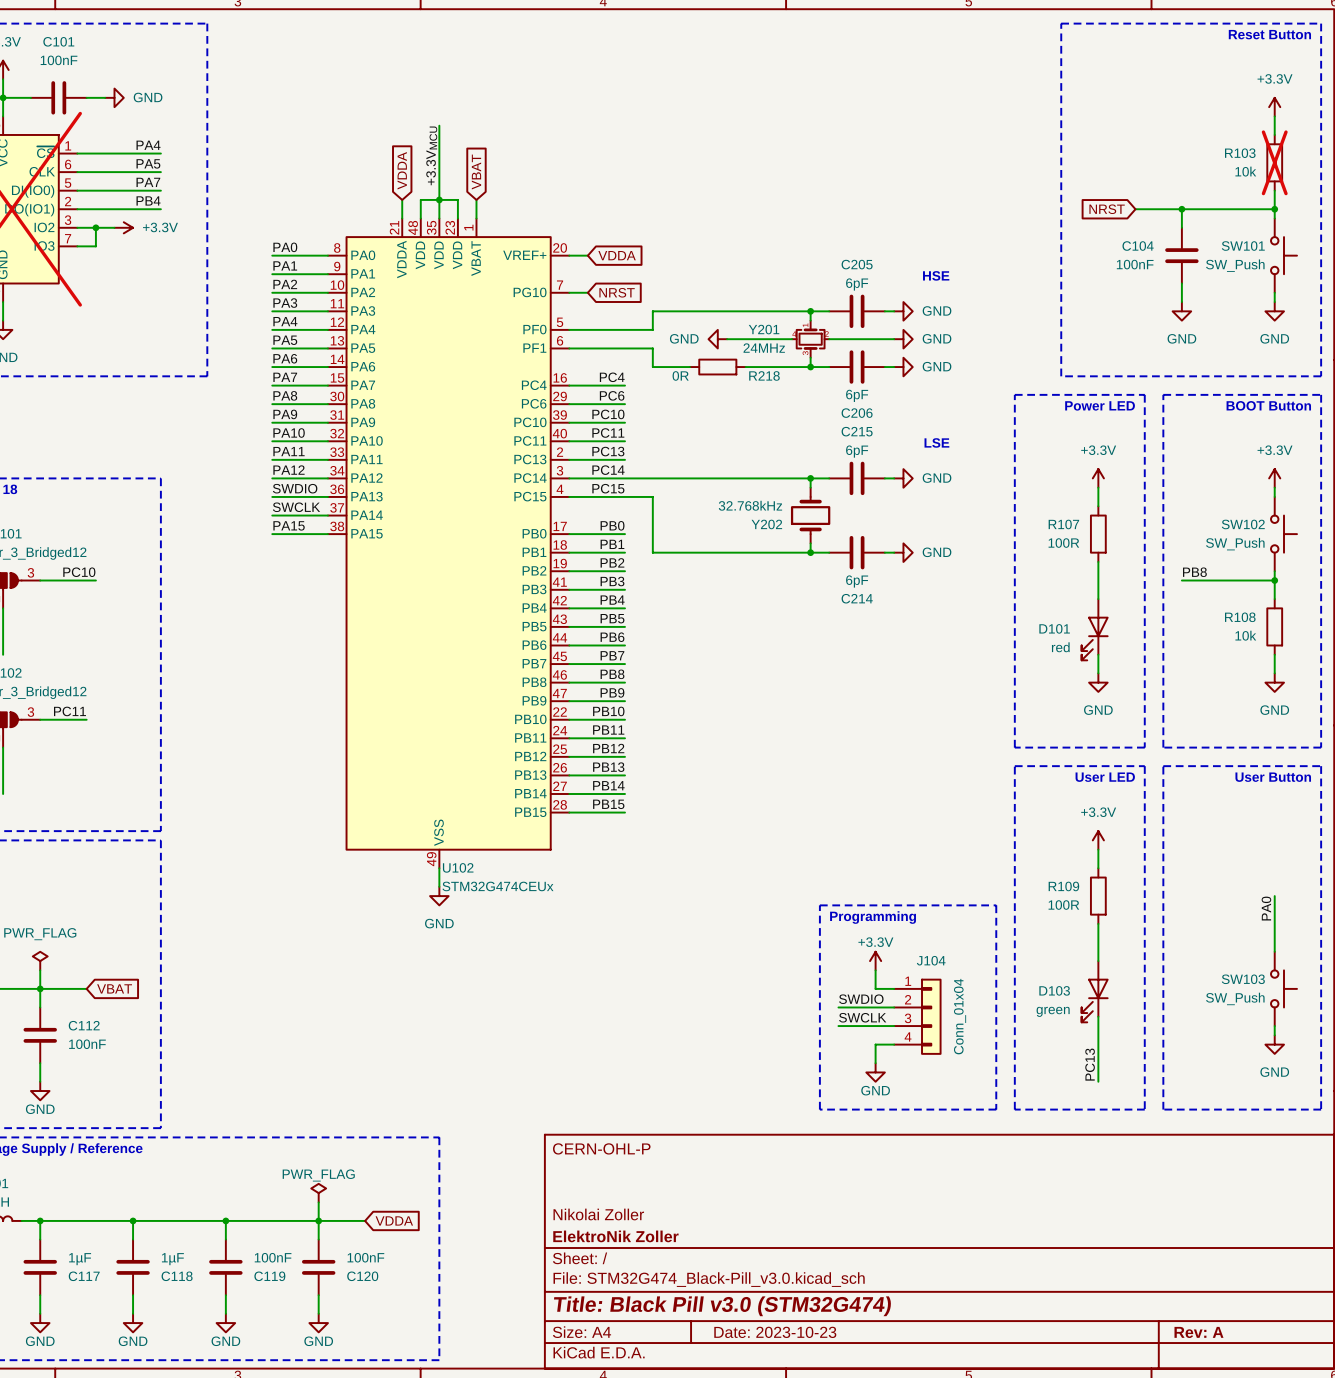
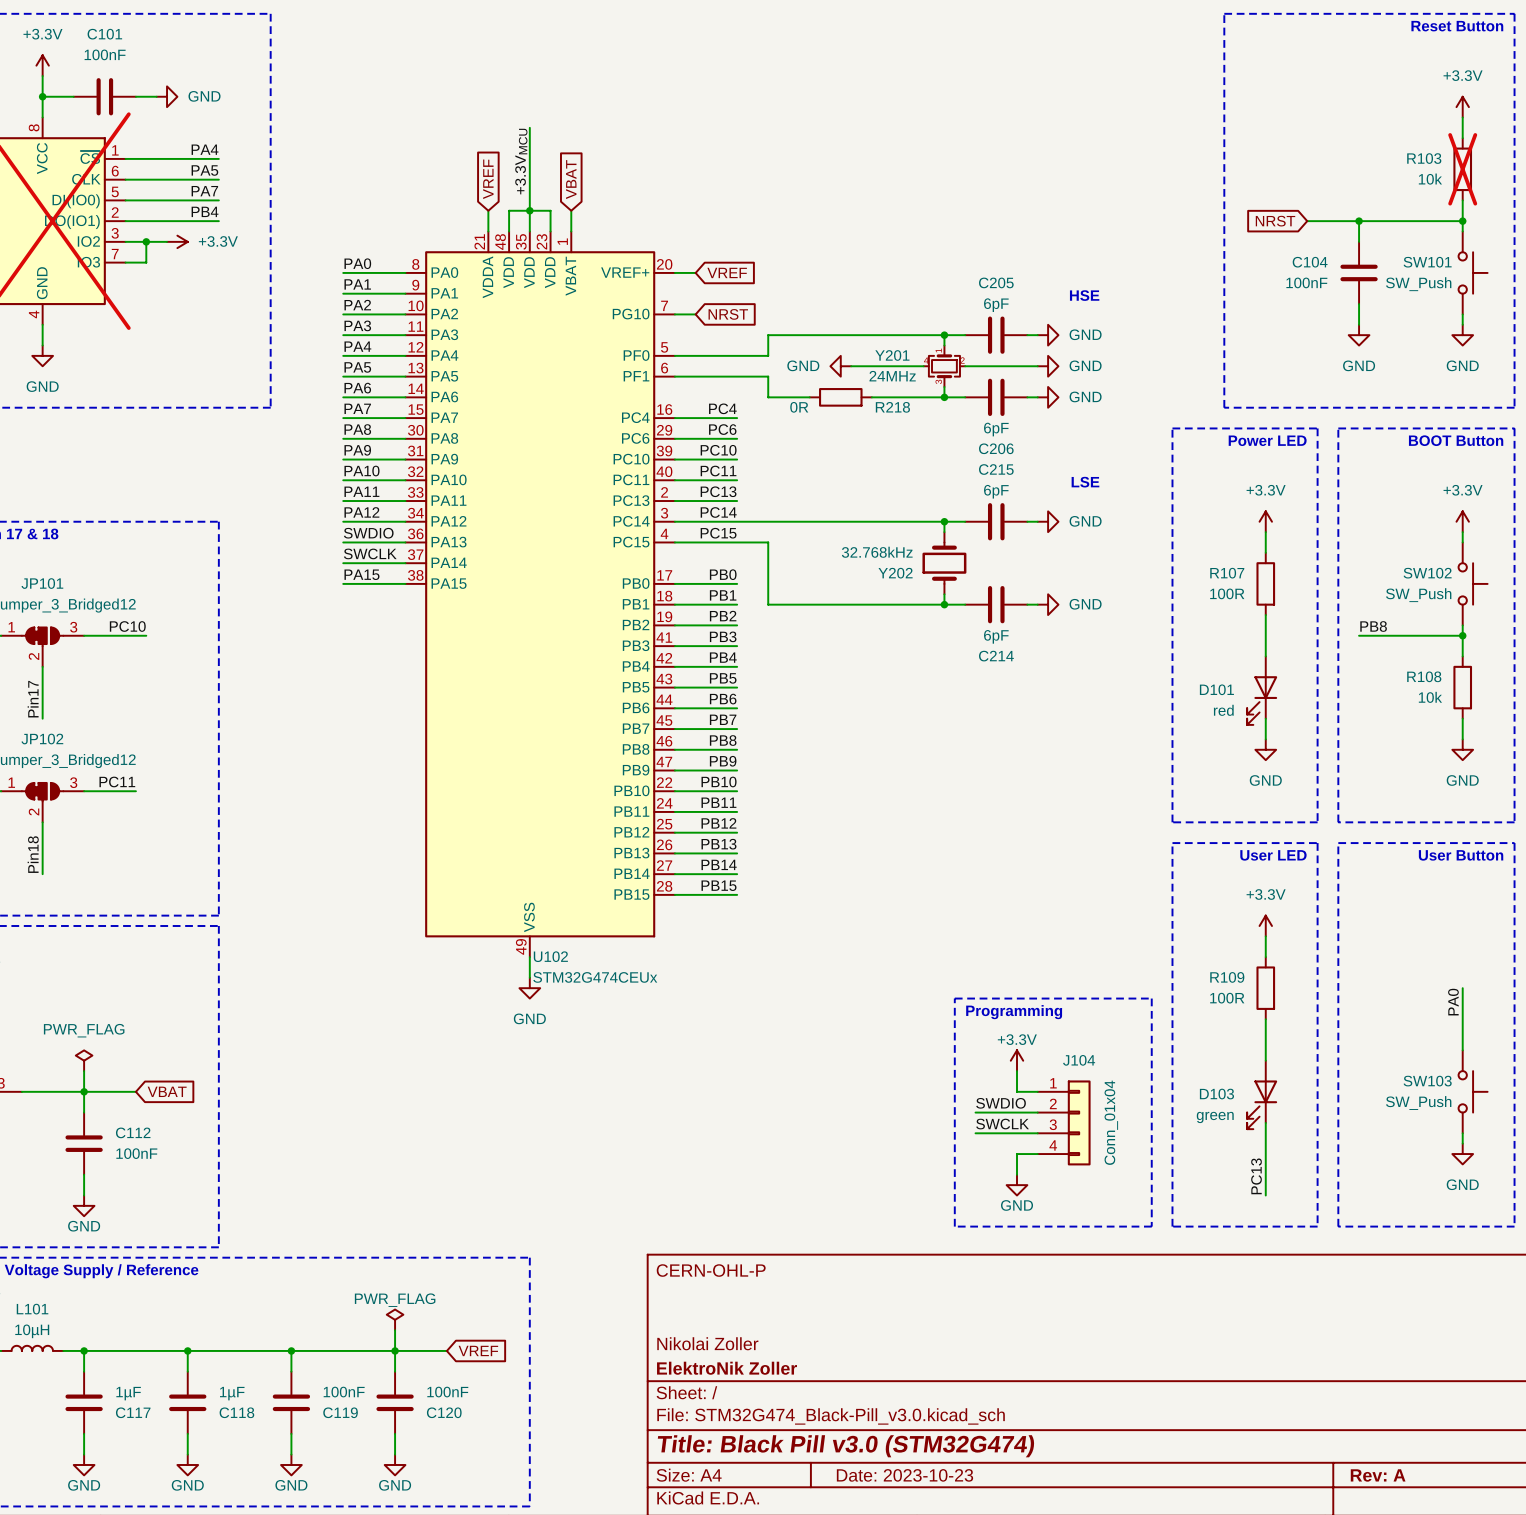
global label: VDDA (402, 170) -> VREF (488, 179)
global label: VDDA (617, 255) -> VREF (727, 272)
global label: VDDA (394, 1220) -> VREF (478, 1350)

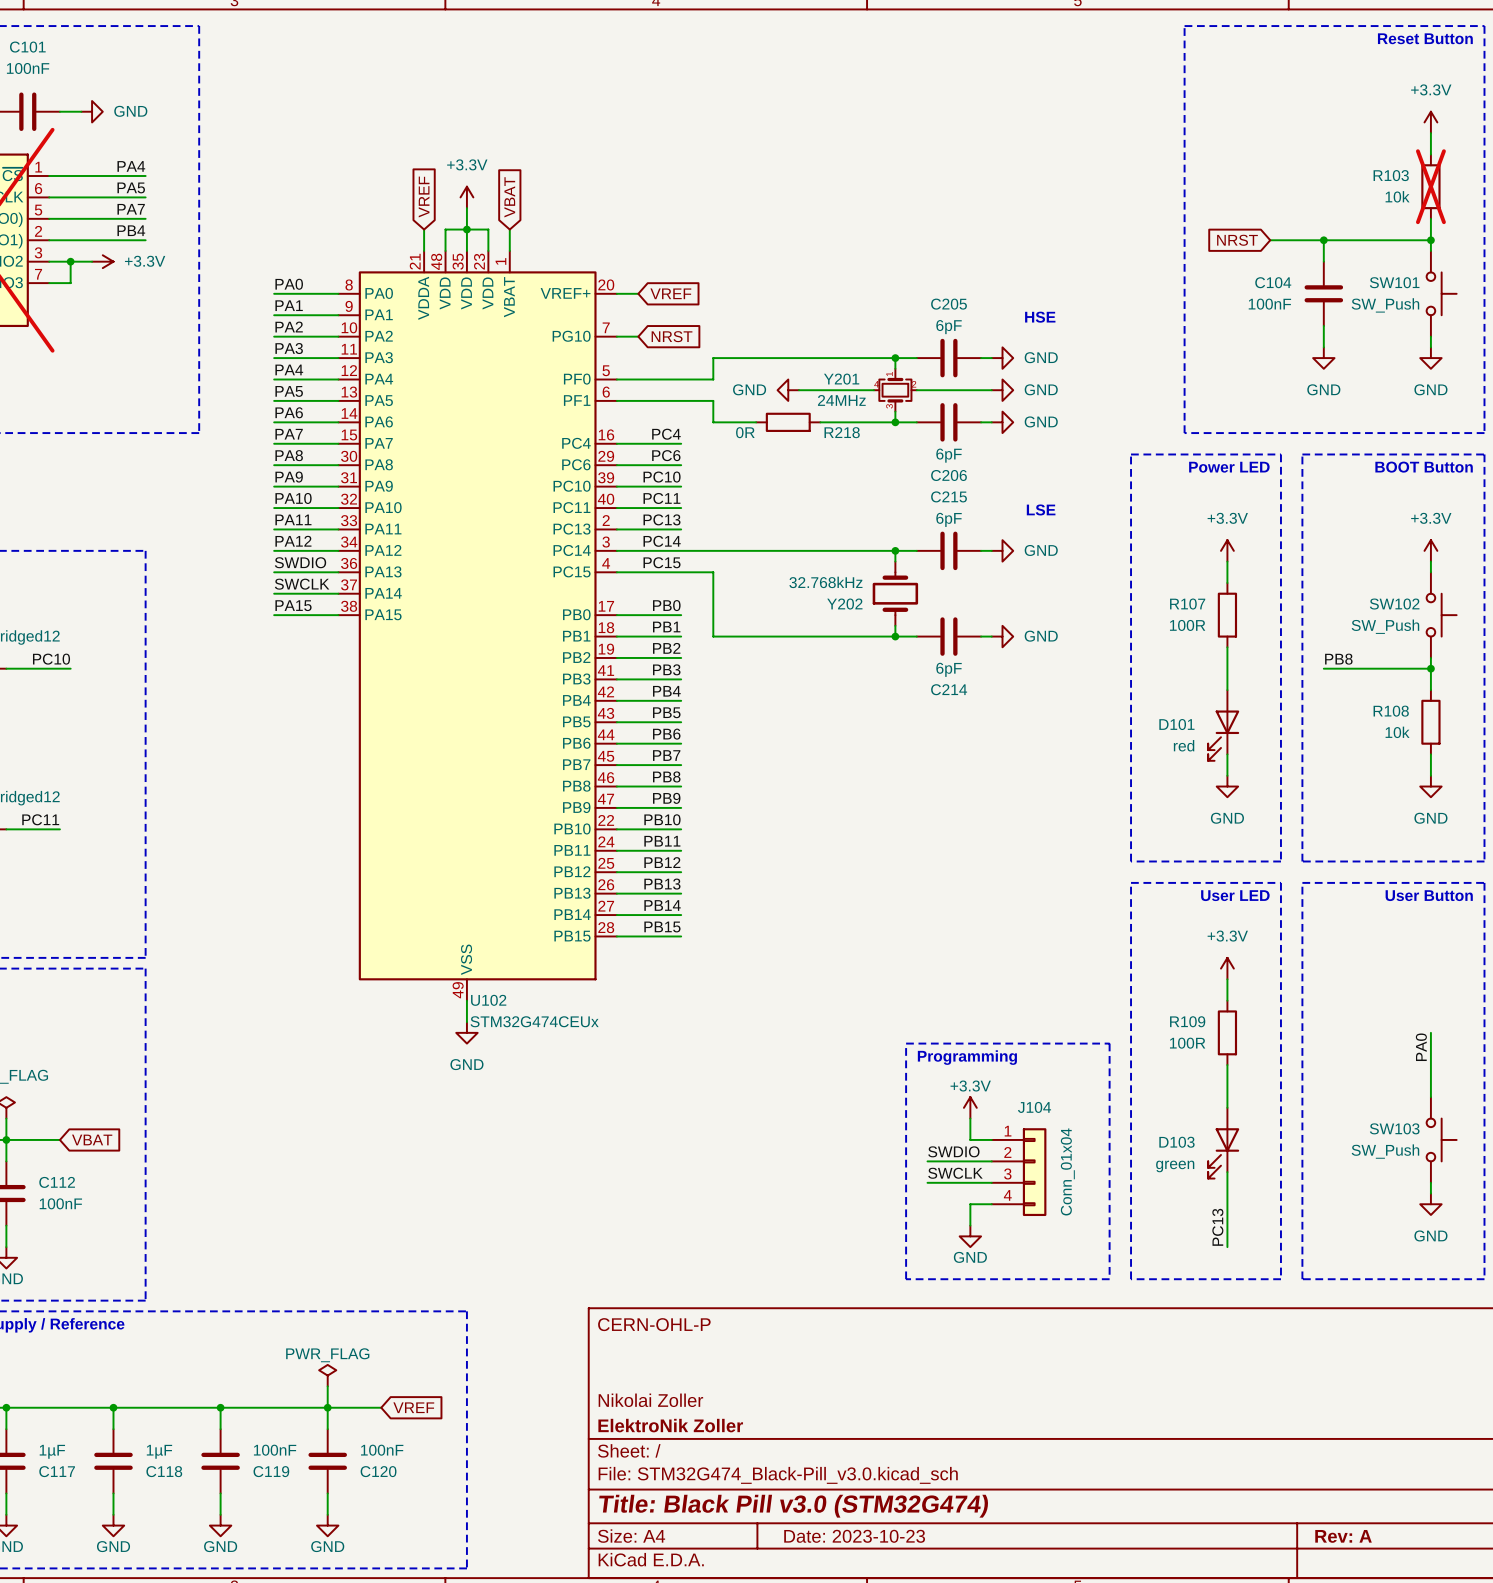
wire: (529, 127) (529, 190) -> none
label: +3.3VMCU (521, 161) -> none
power symbol: none -> +3.3V (466, 197)

